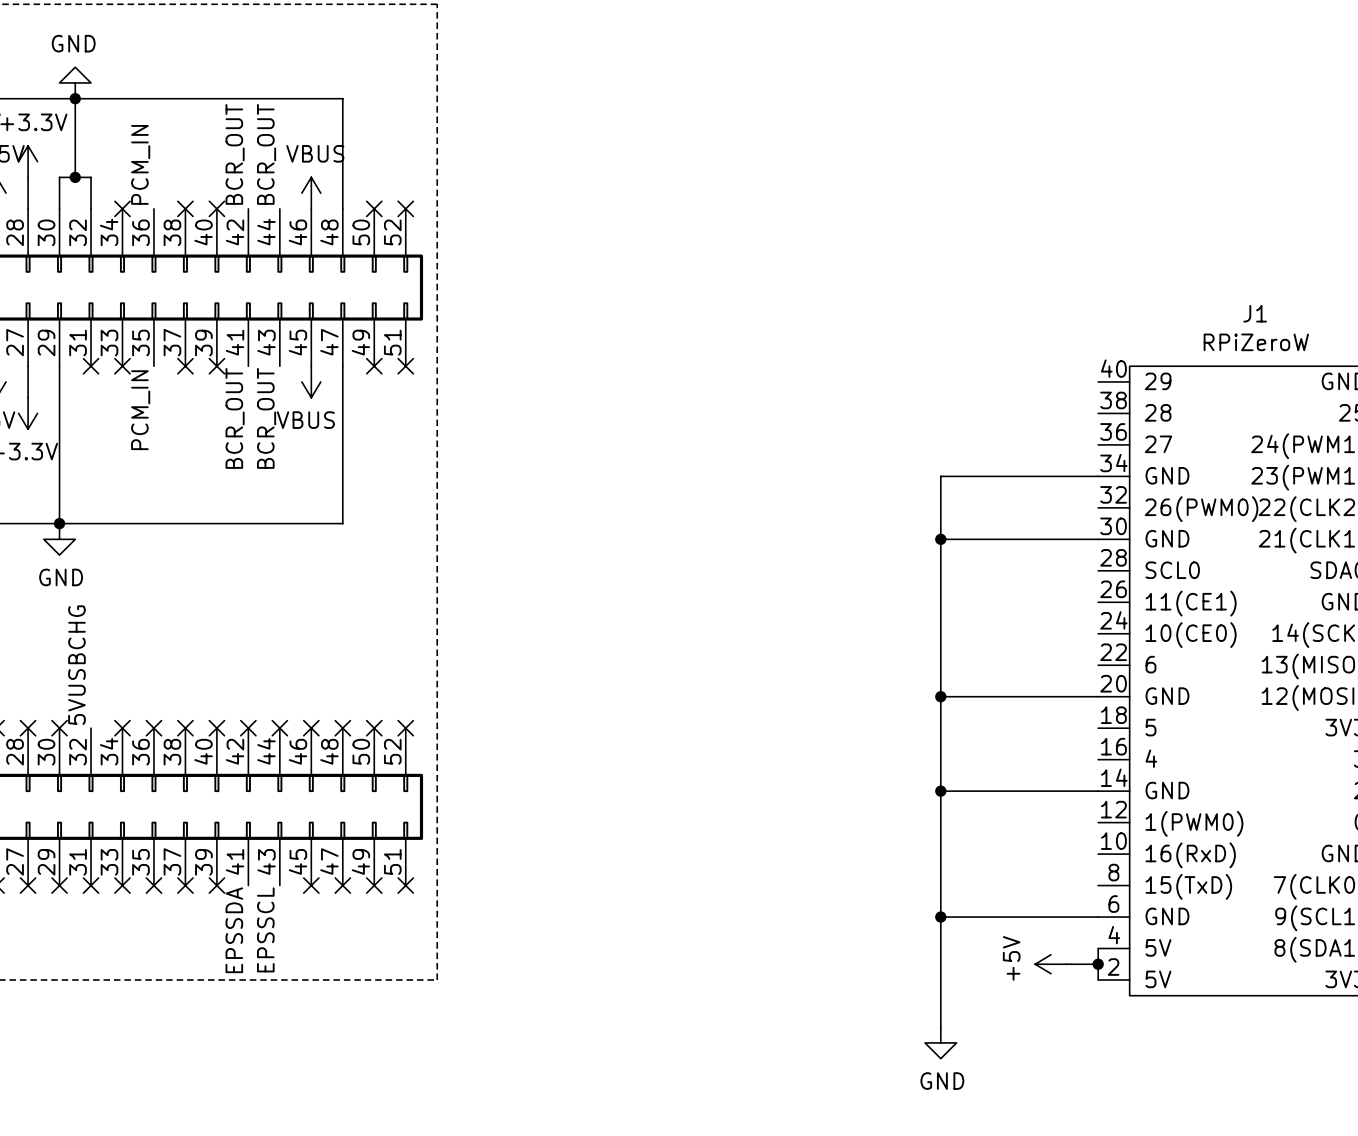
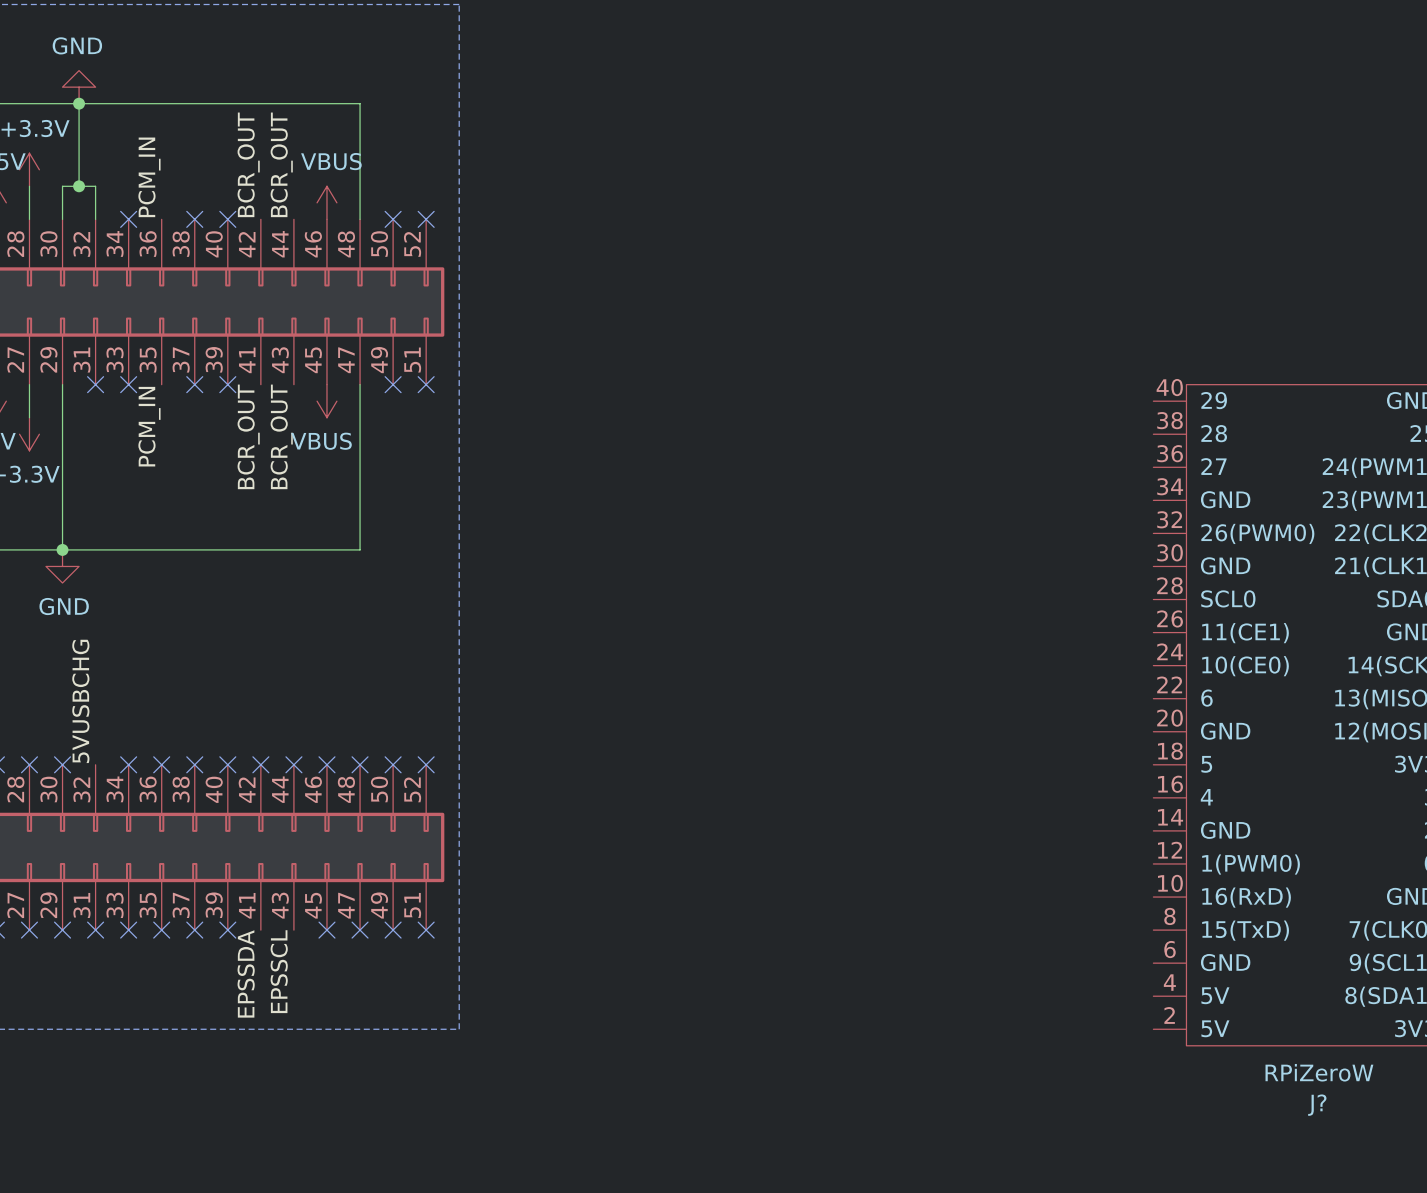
J1 name: J1 (1255, 313) -> J? (1317, 1105)
J1 value position: RPiZeroW (1256, 342) -> RPiZeroW (1319, 1072)
wire: (1098, 476) (940, 476) (940, 1027) -> none
wire: (940, 539) (1098, 539) -> none
junction: (940, 539) -> none
wire: (940, 696) (1098, 696) -> none
junction: (940, 696) -> none
wire: (940, 791) (1098, 791) -> none
junction: (940, 791) -> none
wire: (940, 917) (1098, 917) -> none
junction: (940, 917) -> none
wire: (1098, 948) (1098, 979) -> none
power symbol: +5V (1050, 964) -> none
wire: (1066, 964) (1098, 964) -> none
junction: (1098, 964) -> none
power symbol: GND (940, 1042) -> none

